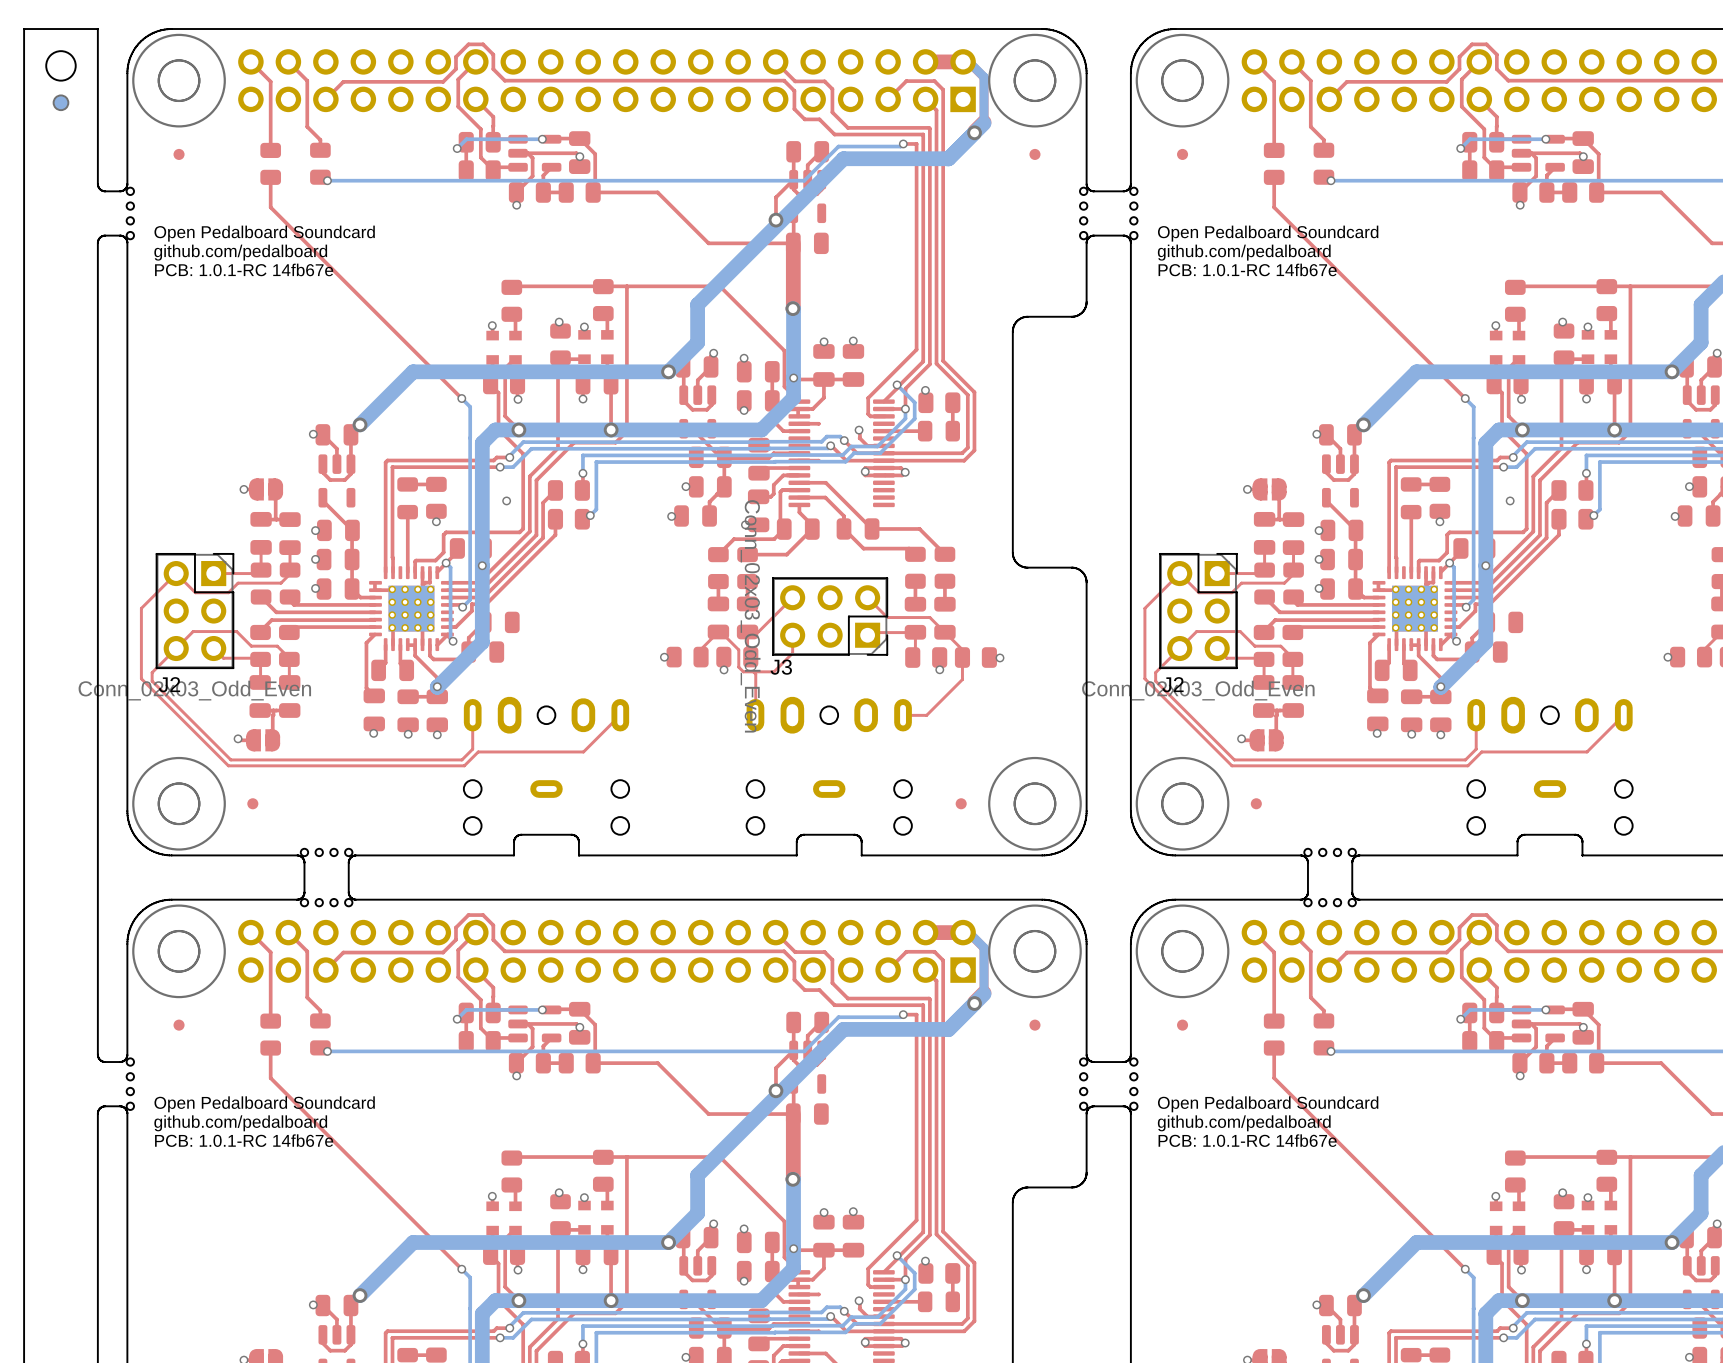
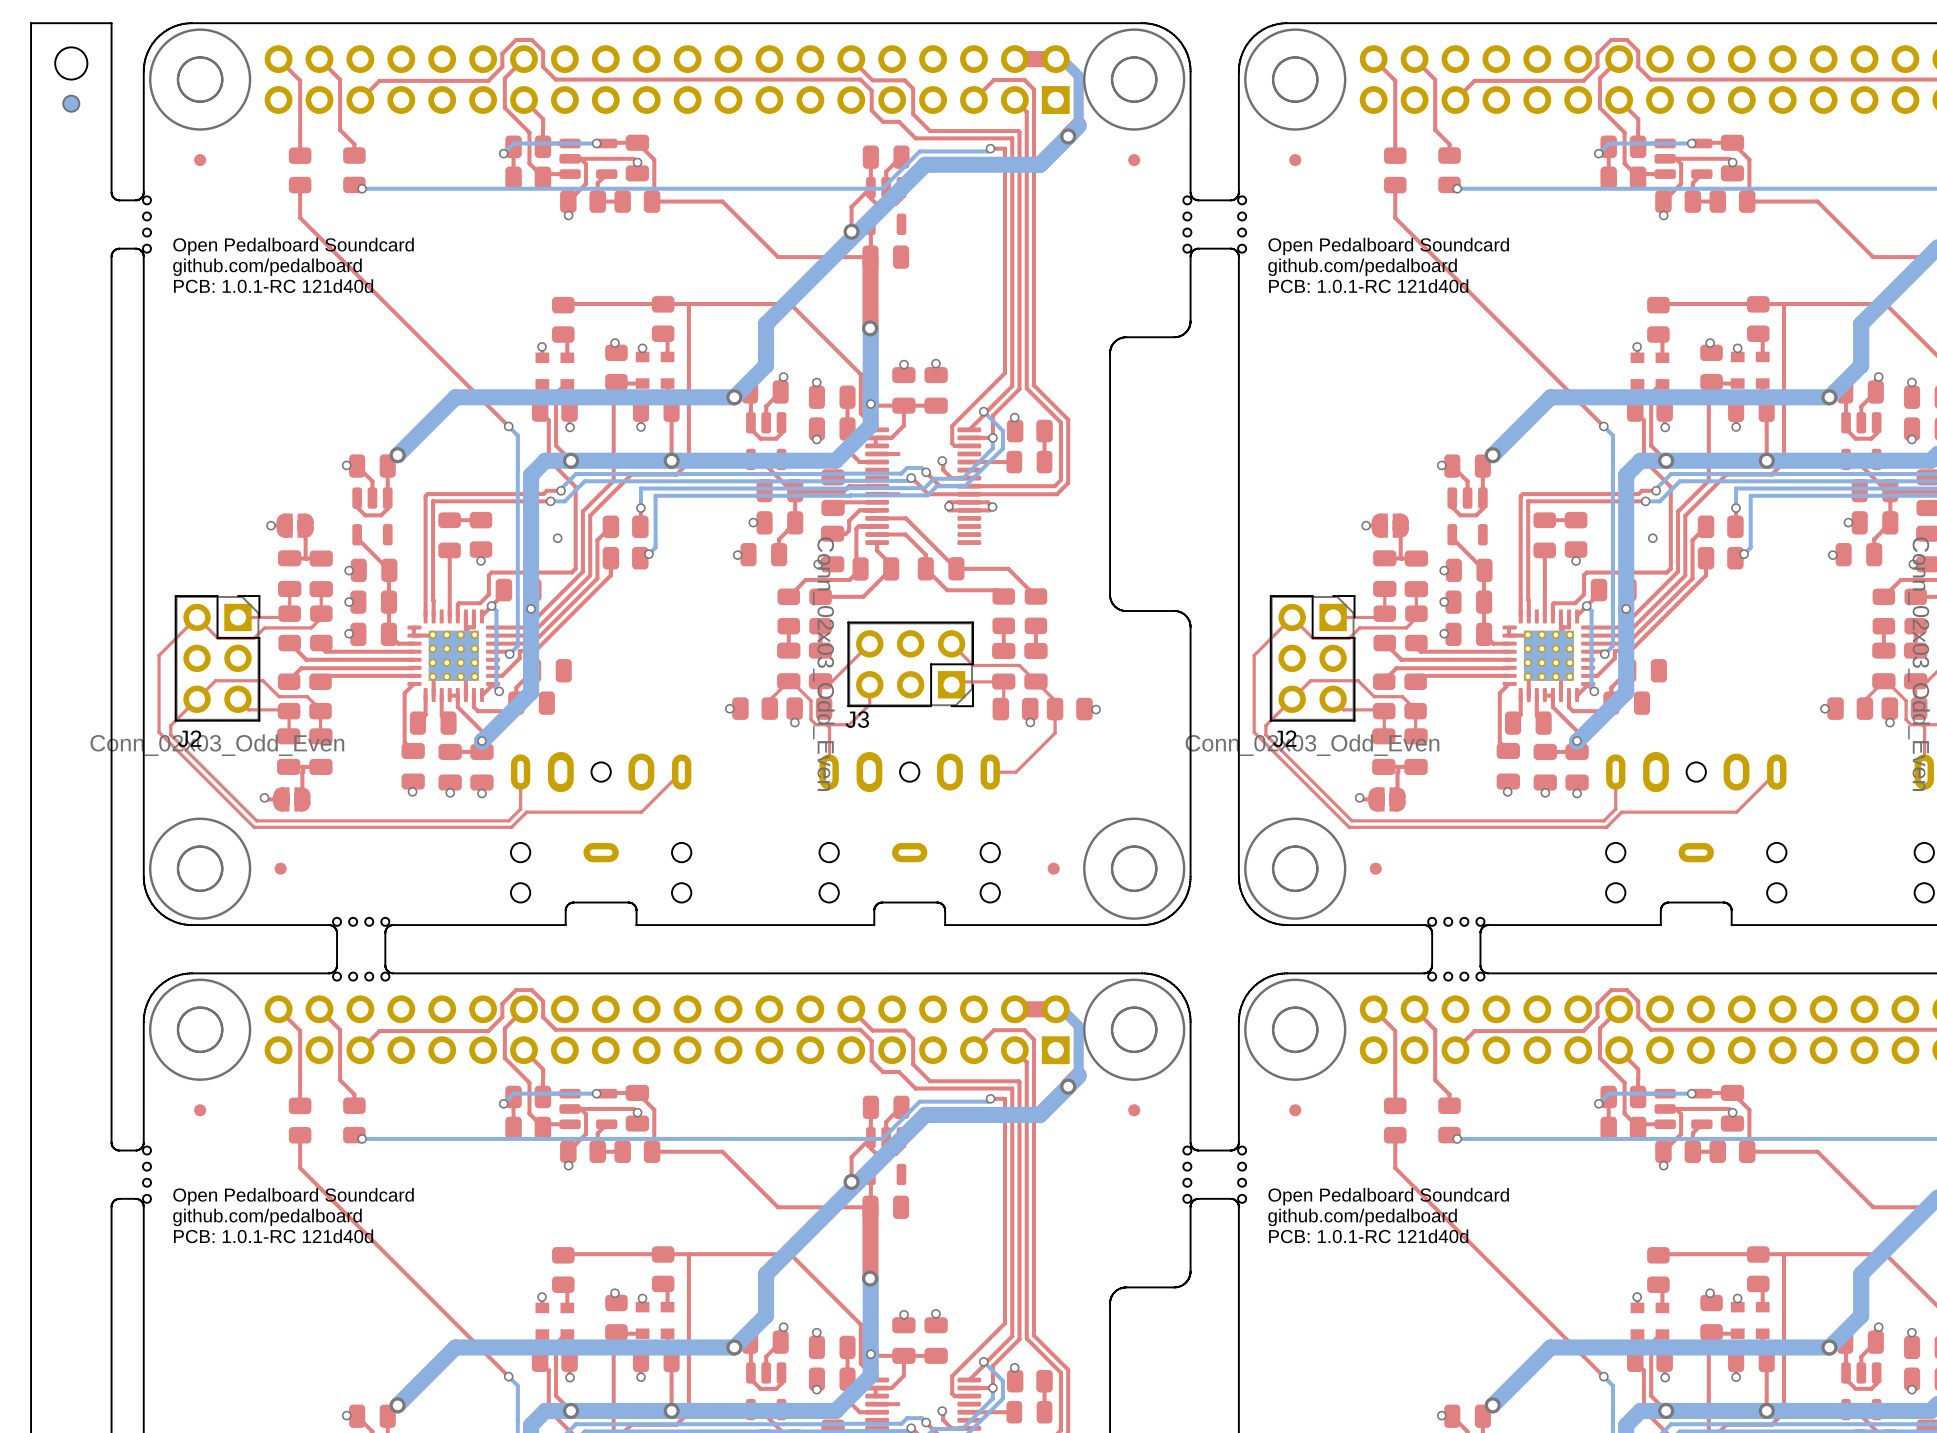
text: PCB: 1.0.1-RC 14fb67e (244, 269) -> PCB: 1.0.1-RC 121d40d (273, 286)
text: PCB: 1.0.1-RC 14fb67e (1247, 269) -> PCB: 1.0.1-RC 121d40d (1368, 286)
text: PCB: 1.0.1-RC 14fb67e (244, 1140) -> PCB: 1.0.1-RC 121d40d (273, 1236)
text: PCB: 1.0.1-RC 14fb67e (1247, 1140) -> PCB: 1.0.1-RC 121d40d (1368, 1236)

